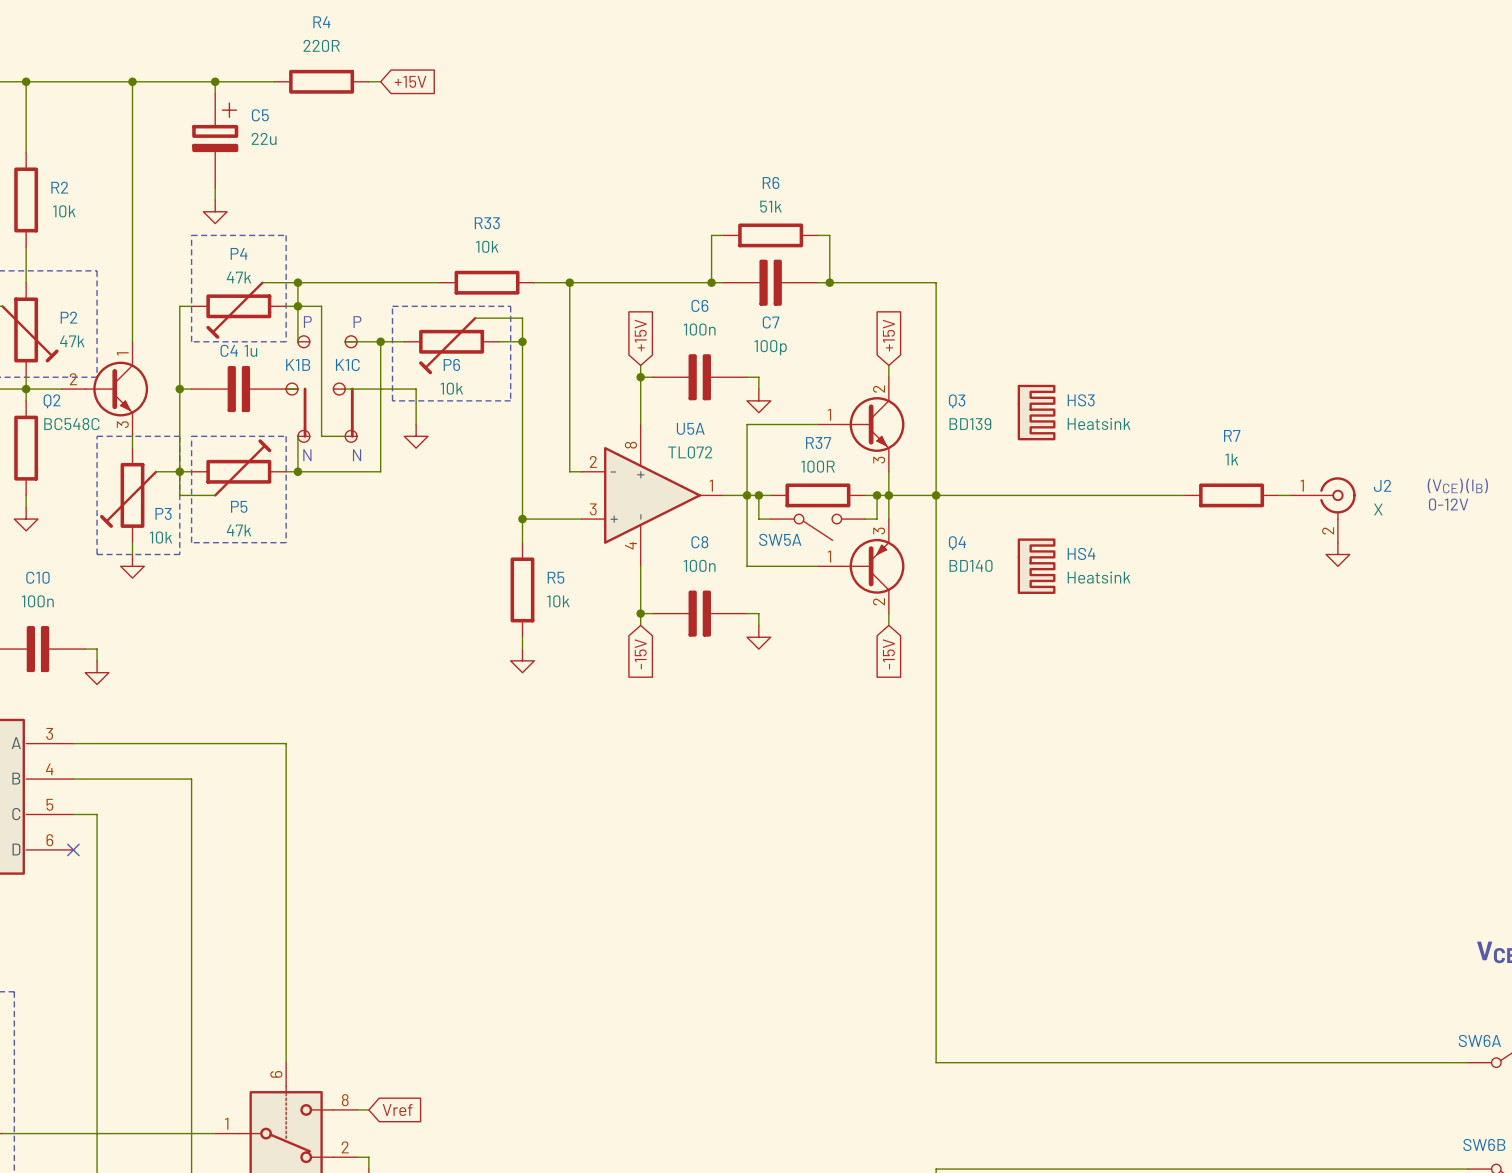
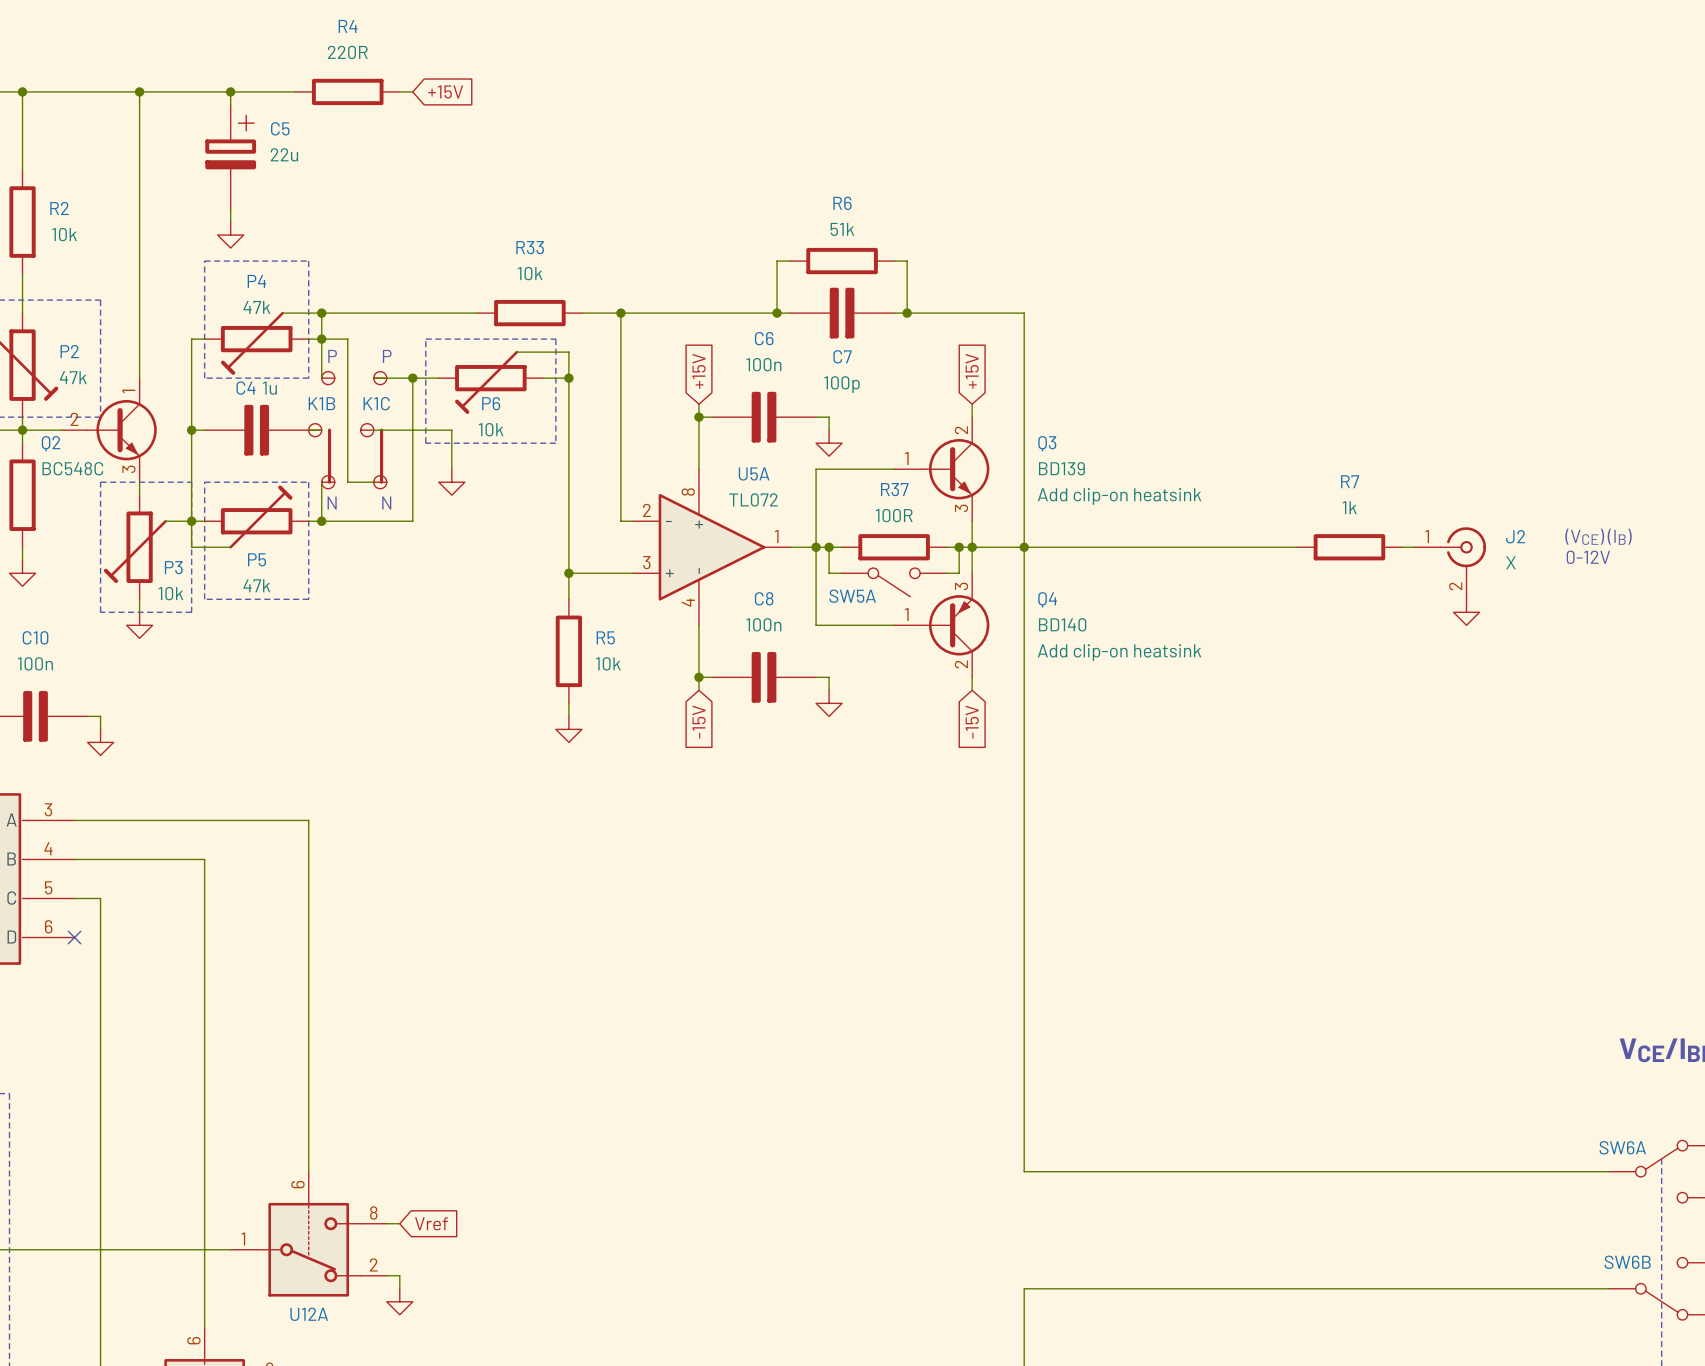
HS3: Heatsink (1036, 412) -> none
Q3 text: none -> Add clip-on heatsink (1119, 496)
HS4: Heatsink (1036, 566) -> none
Q4 text: none -> Add clip-on heatsink (1119, 652)

